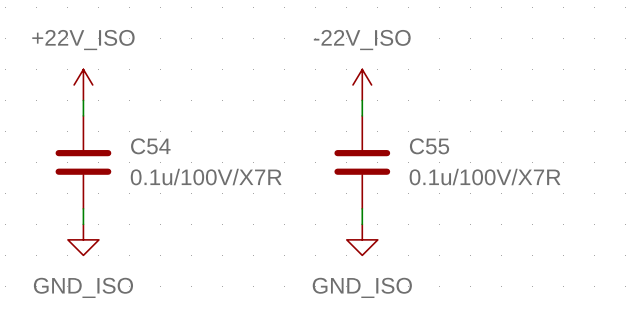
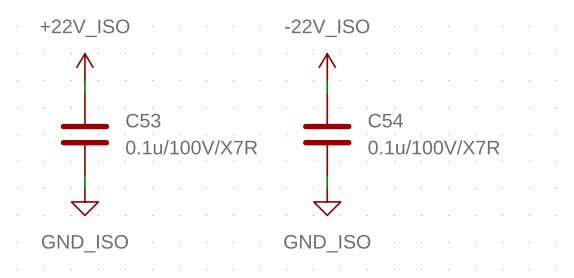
C54 name: C54 (150, 146) -> C53 (143, 120)
C55 name: C55 (429, 146) -> C54 (385, 120)

